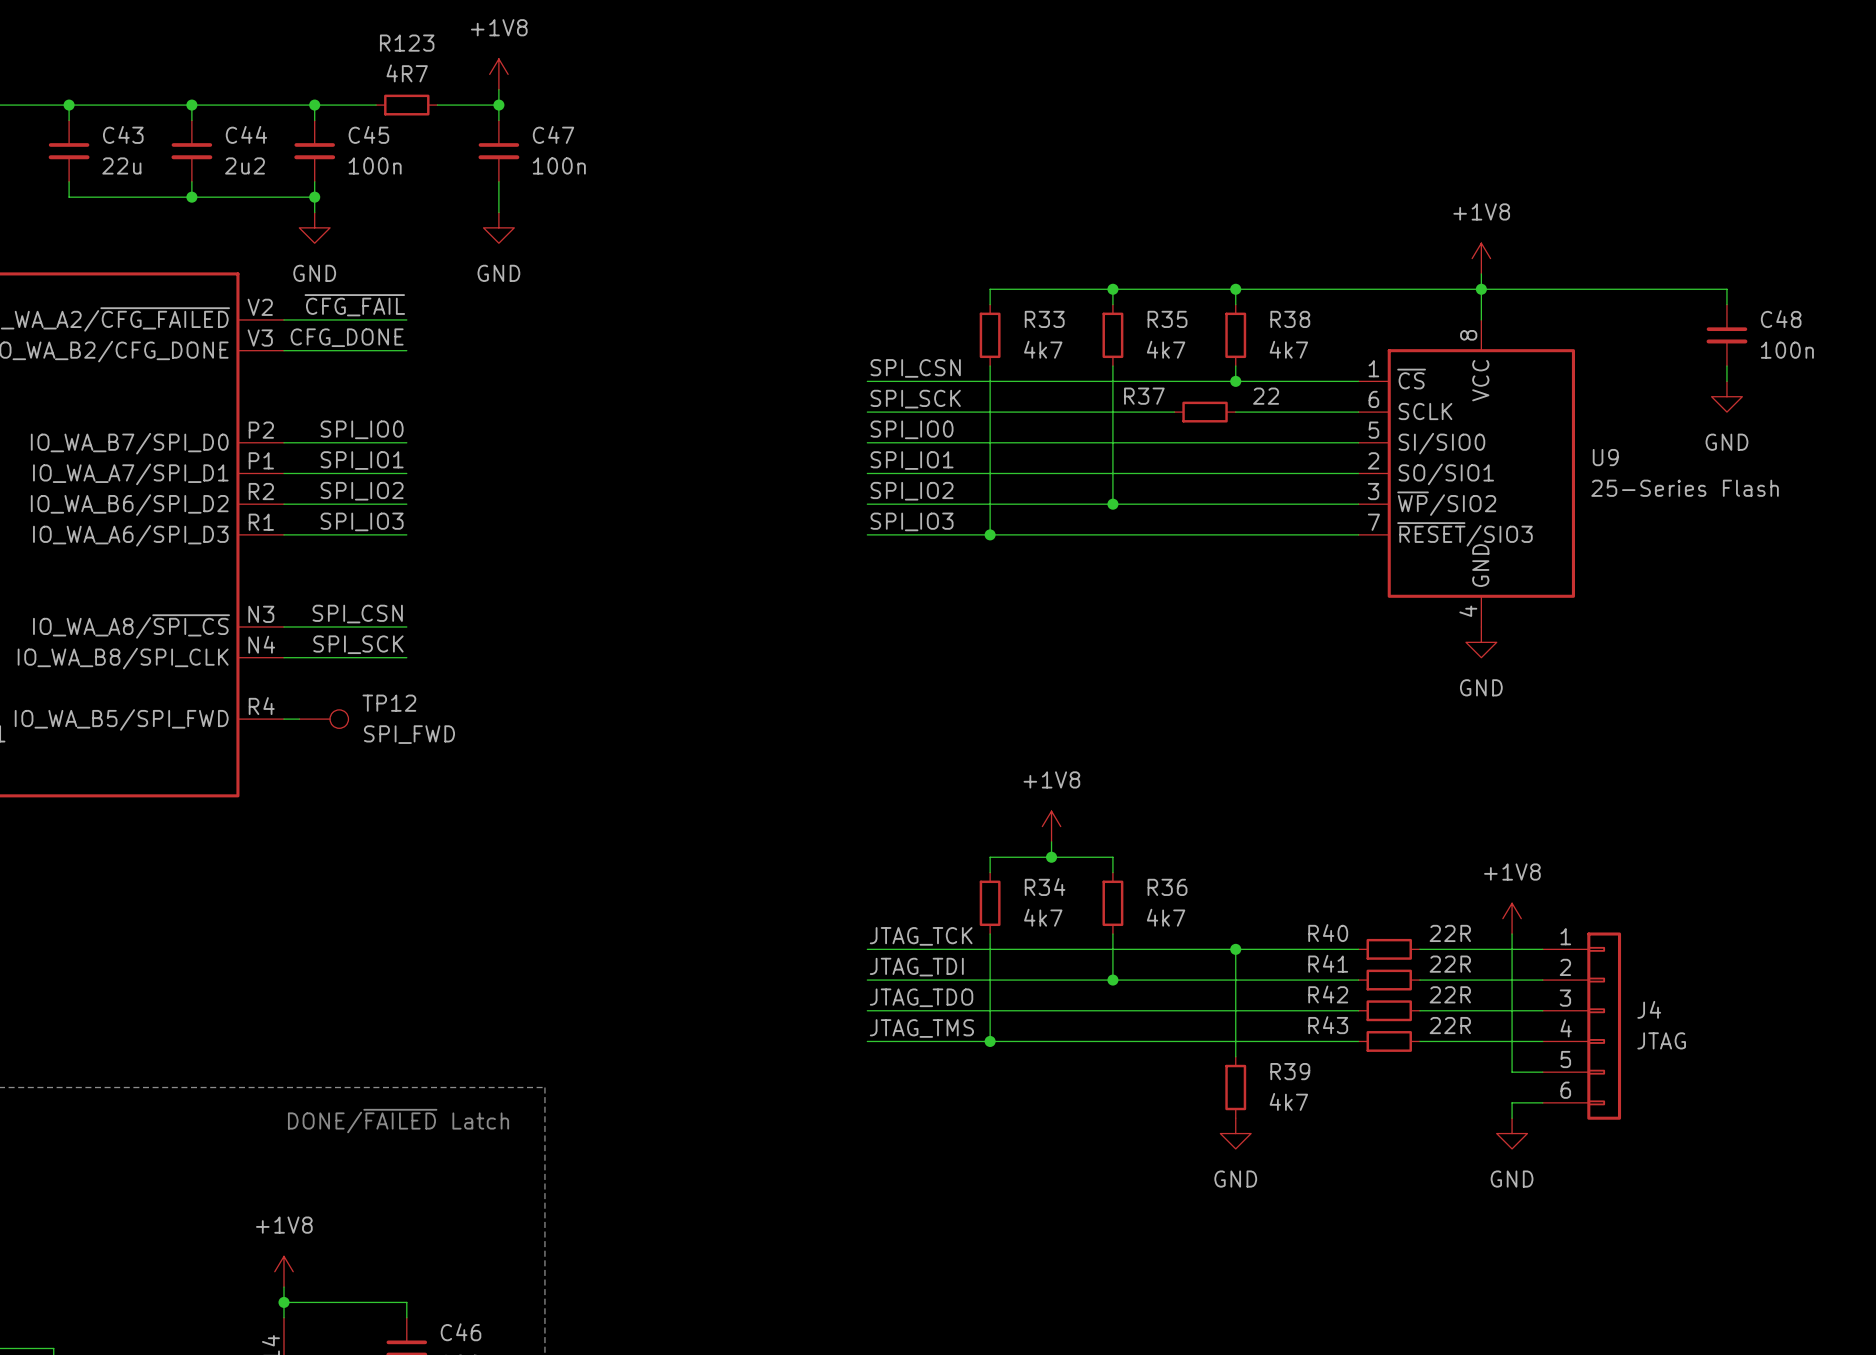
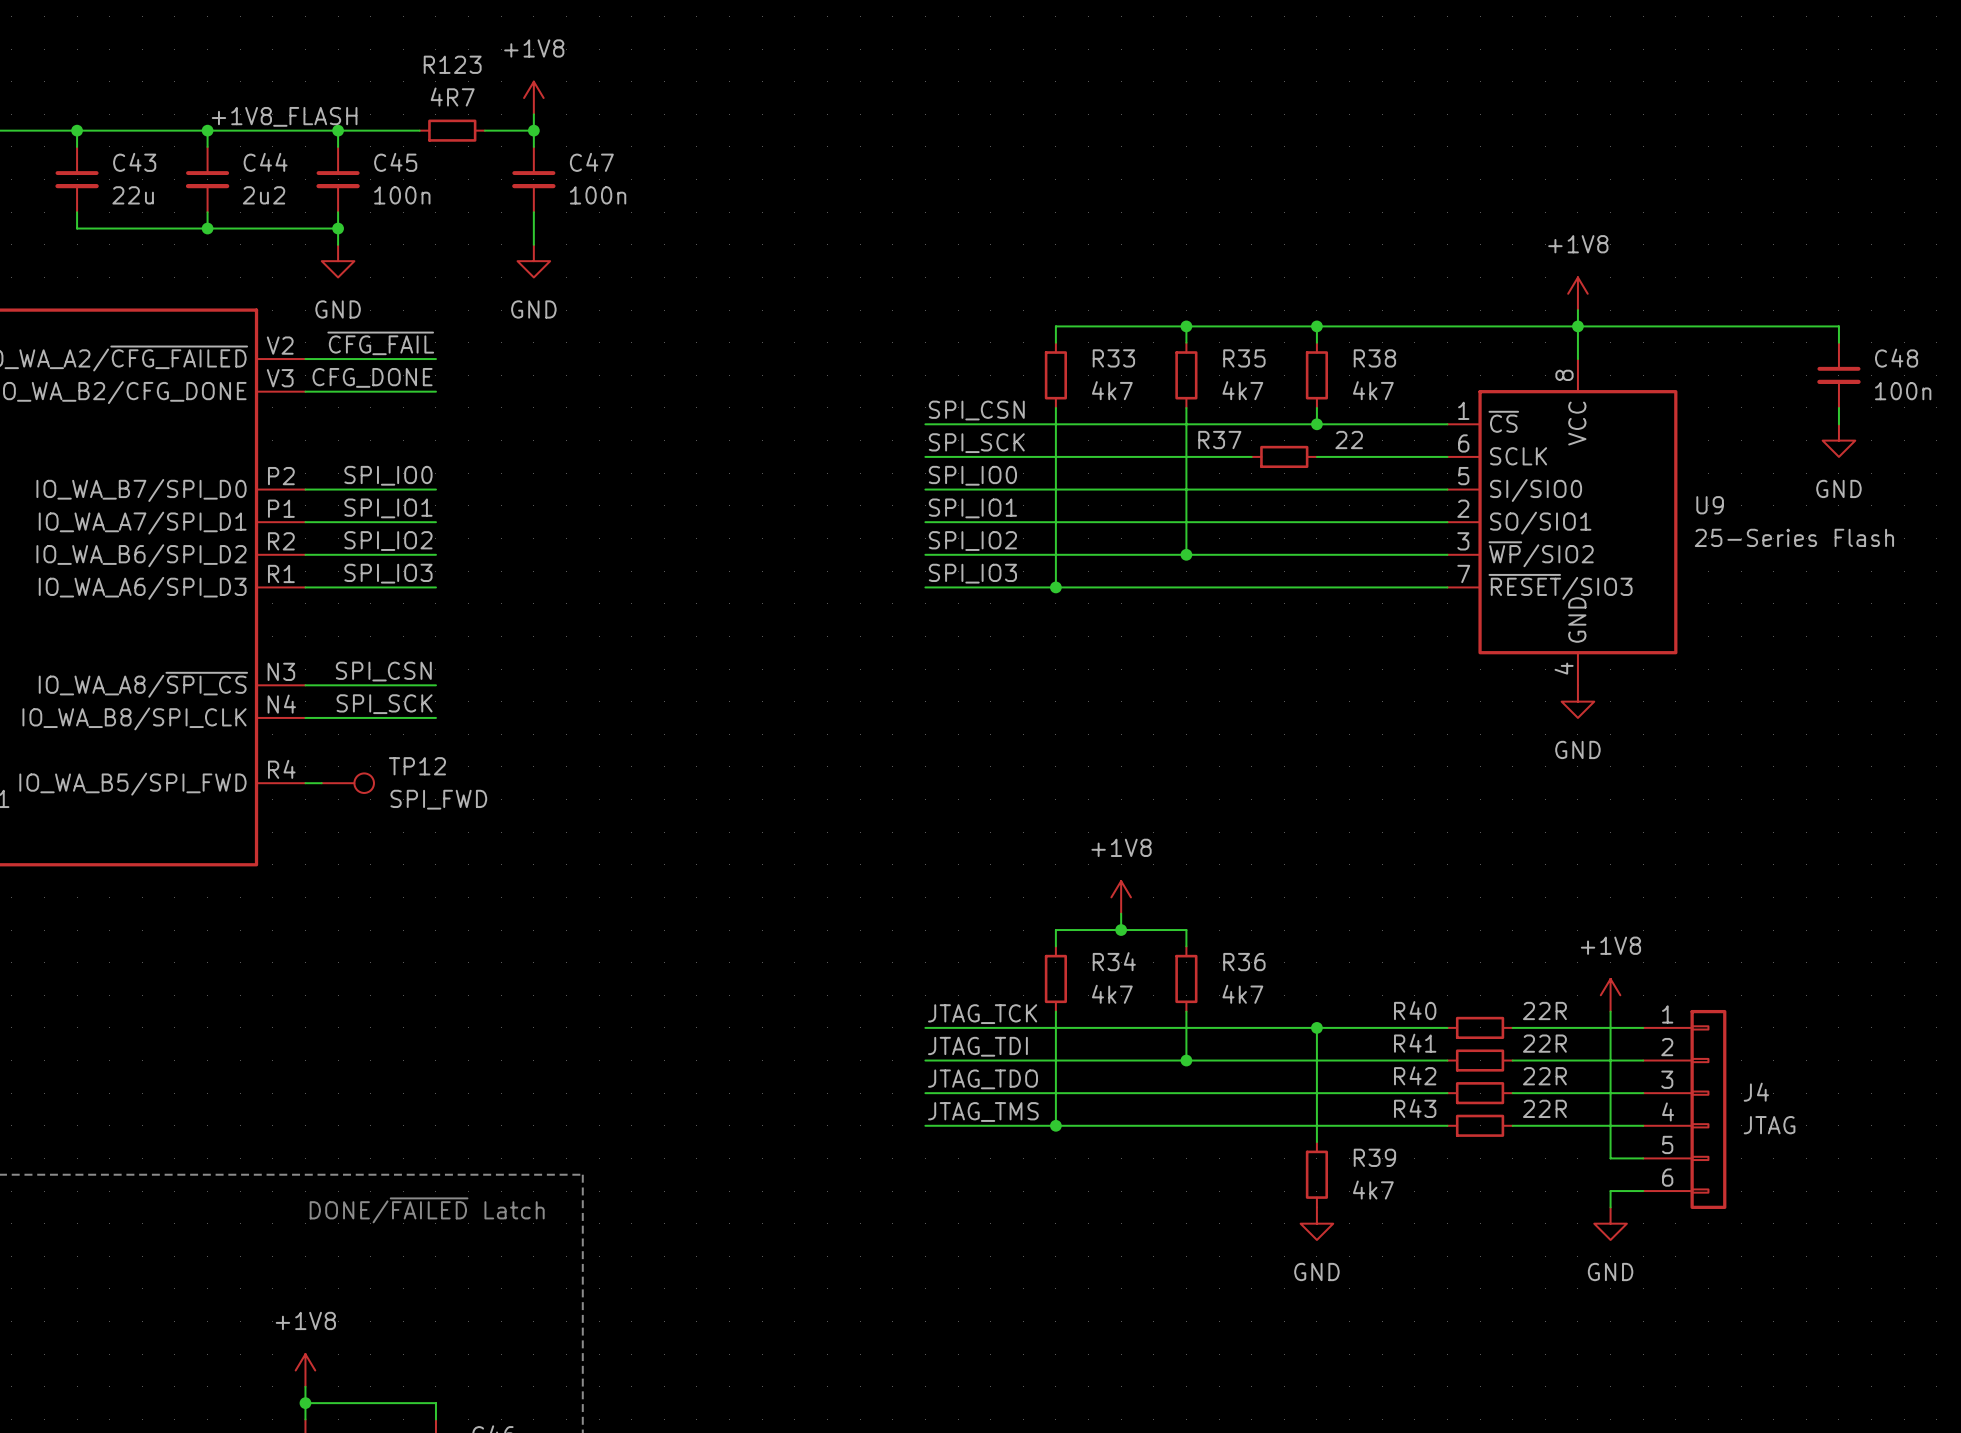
label: none -> +1V8_FLASH (284, 116)
R123 position: (406, 105) -> (452, 130)

